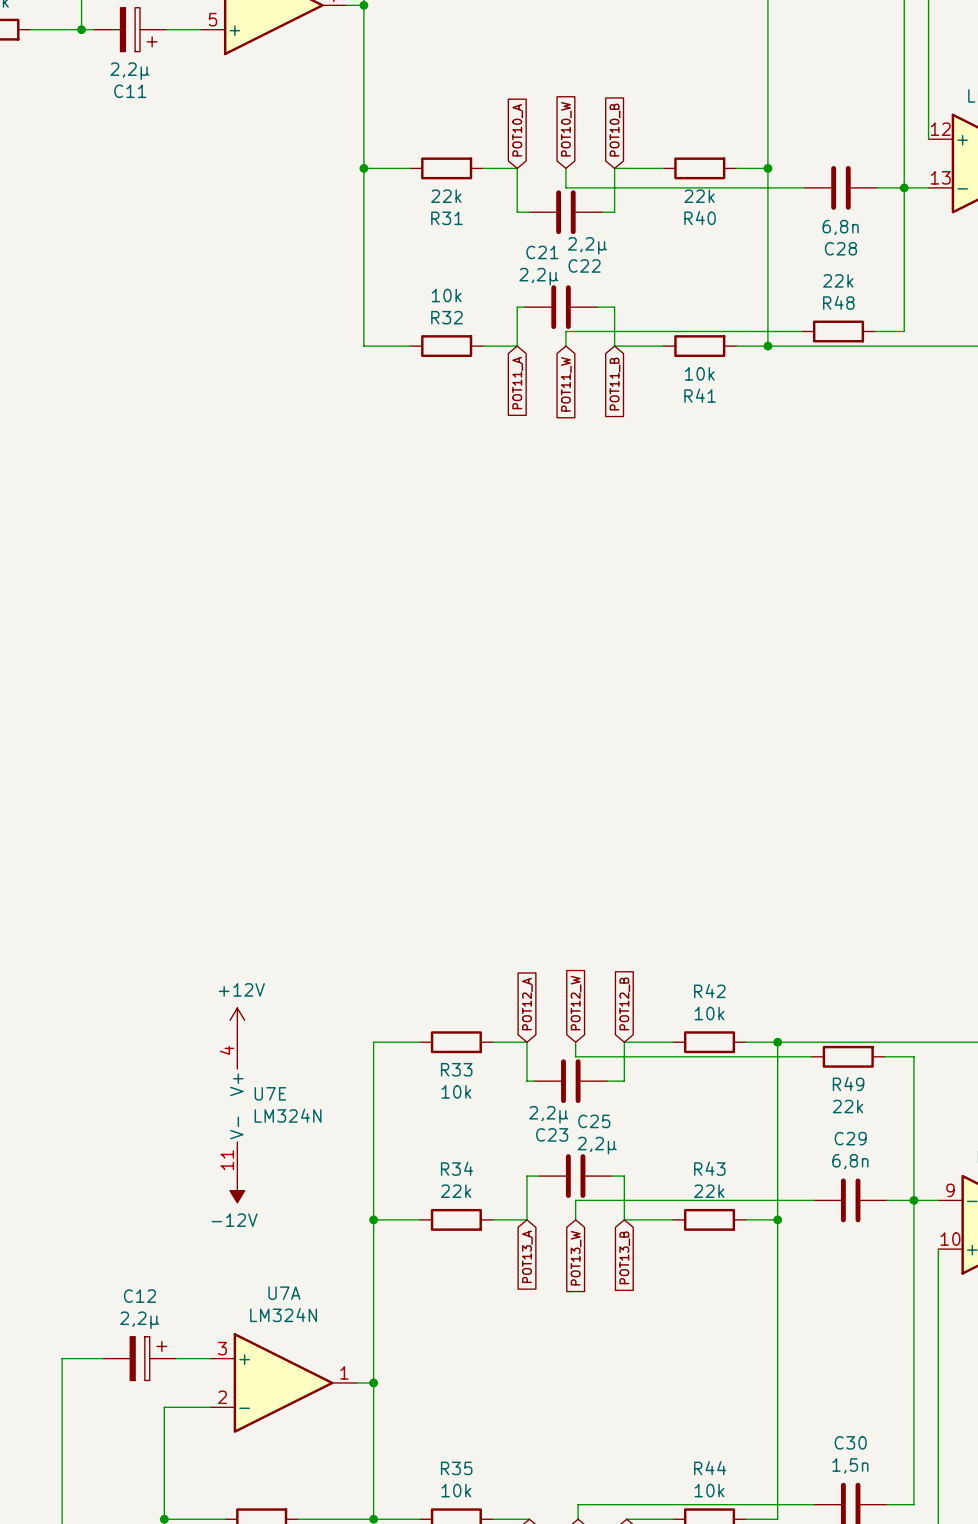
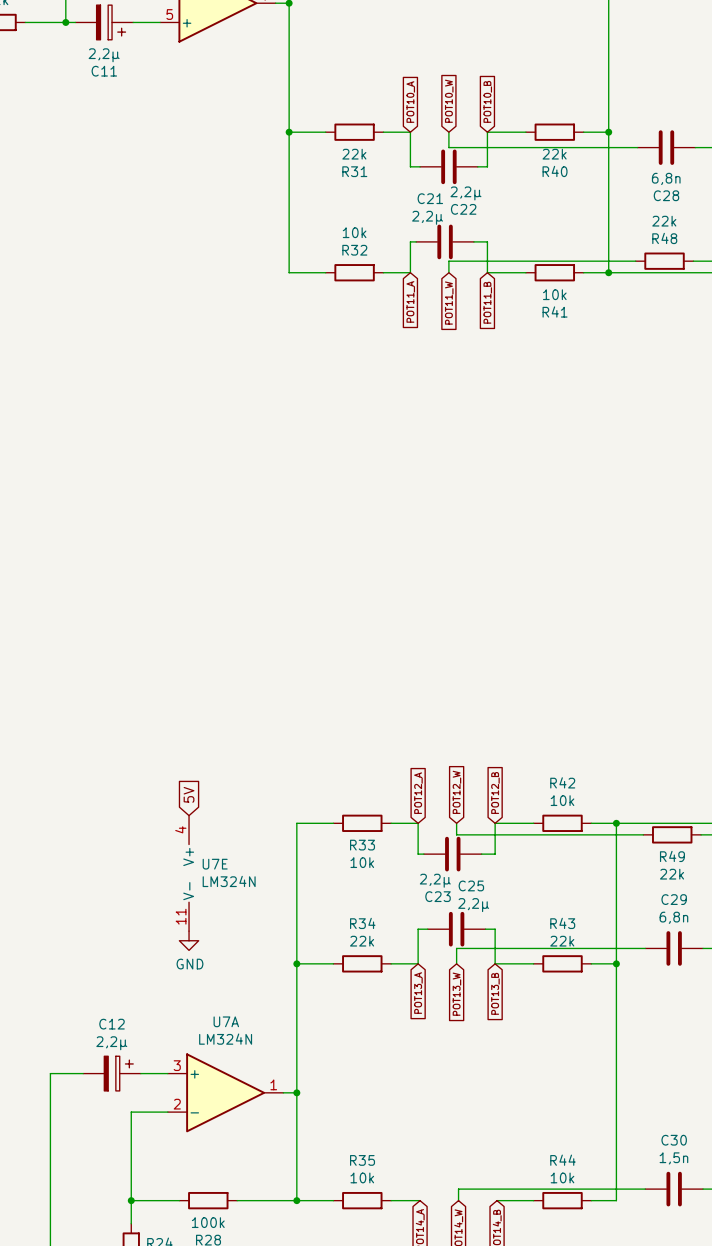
global label: none -> 5V (189, 794)
power symbol: +12V (237, 1020) -> none
power symbol: -12V (237, 1190) -> GND (189, 940)

